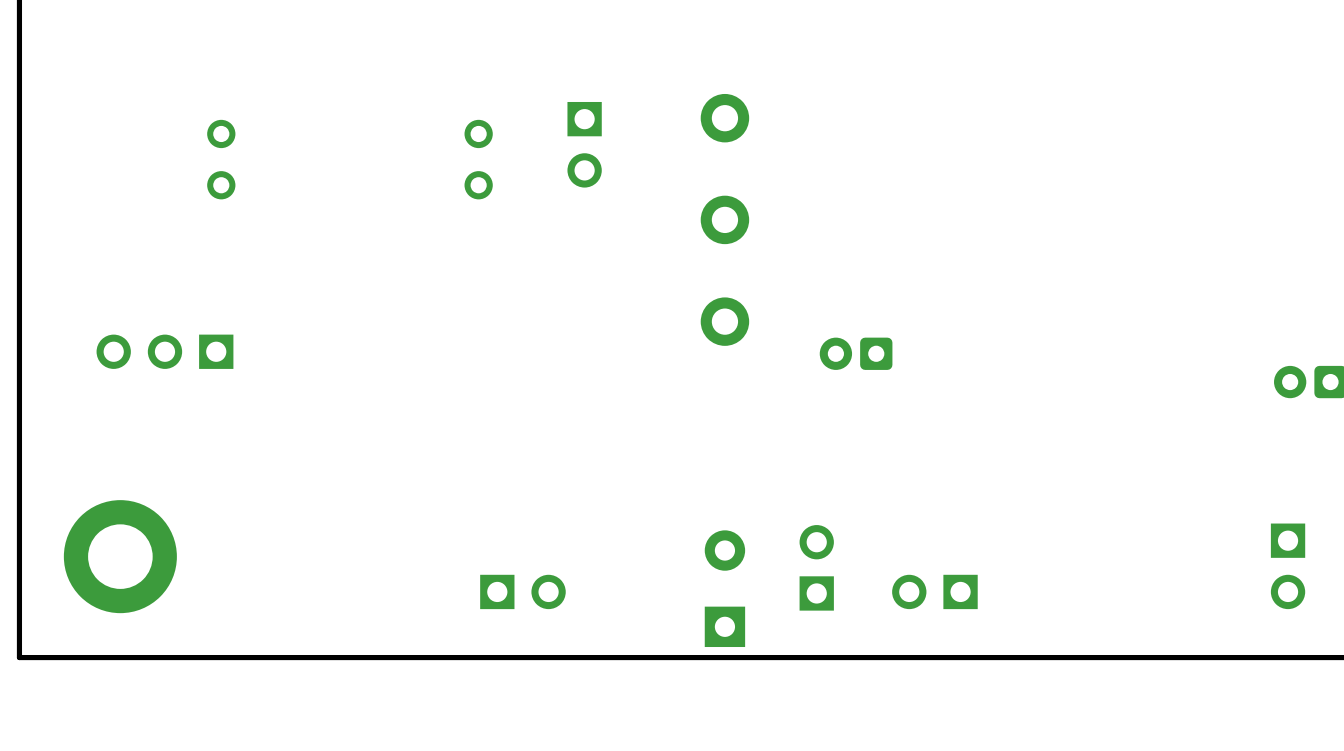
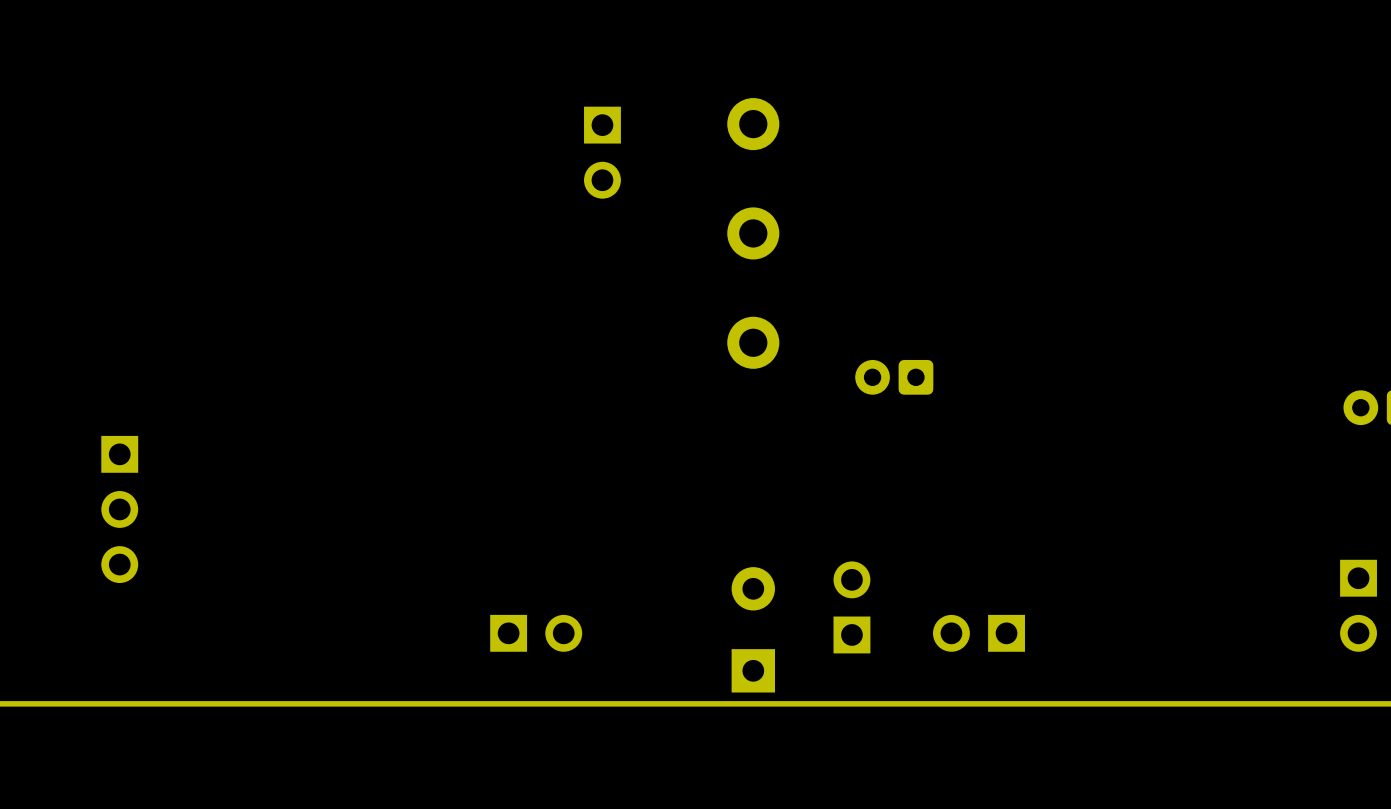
part: (221, 159) -> none
part: (478, 159) -> none
part rotation: 0° (164, 351) -> 90° counterclockwise (119, 509)
part position: (164, 351) -> (119, 509)
part: (120, 556) -> none

